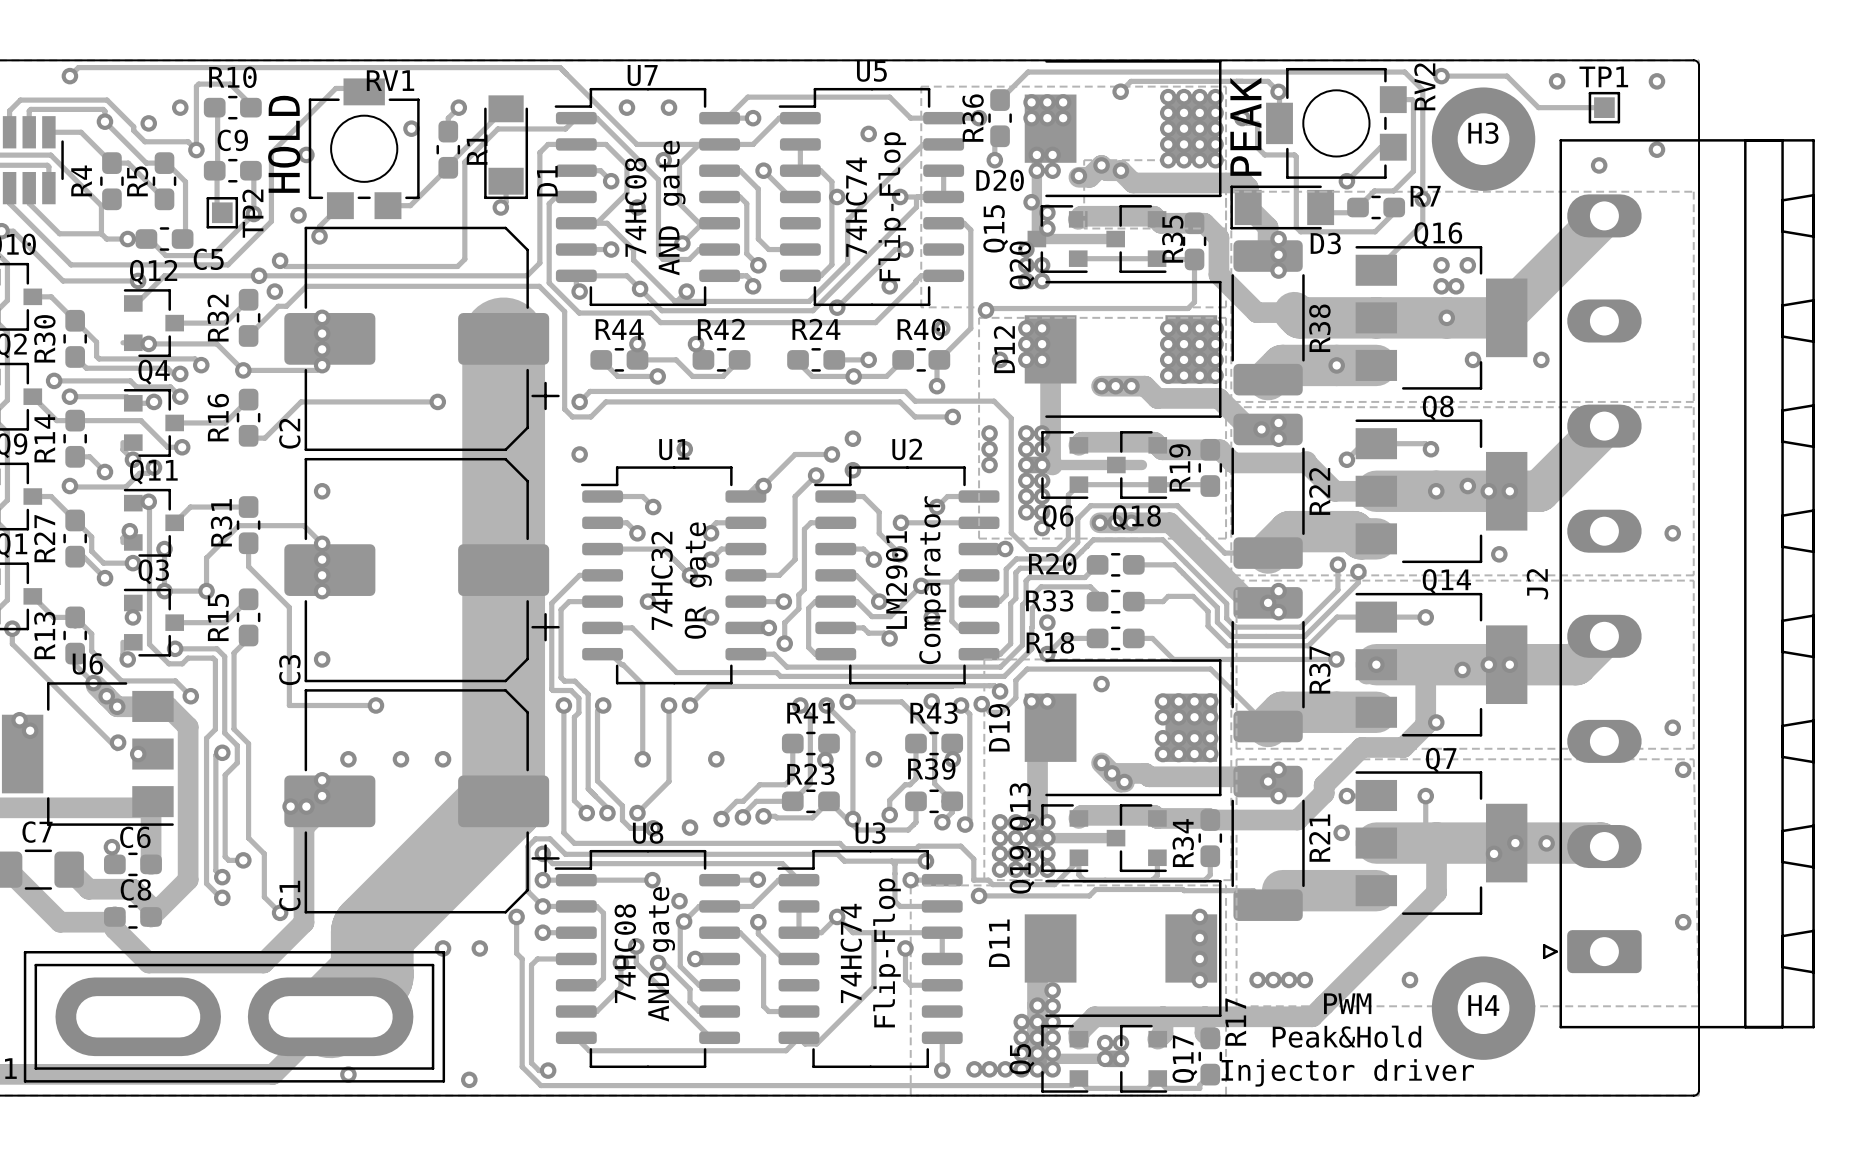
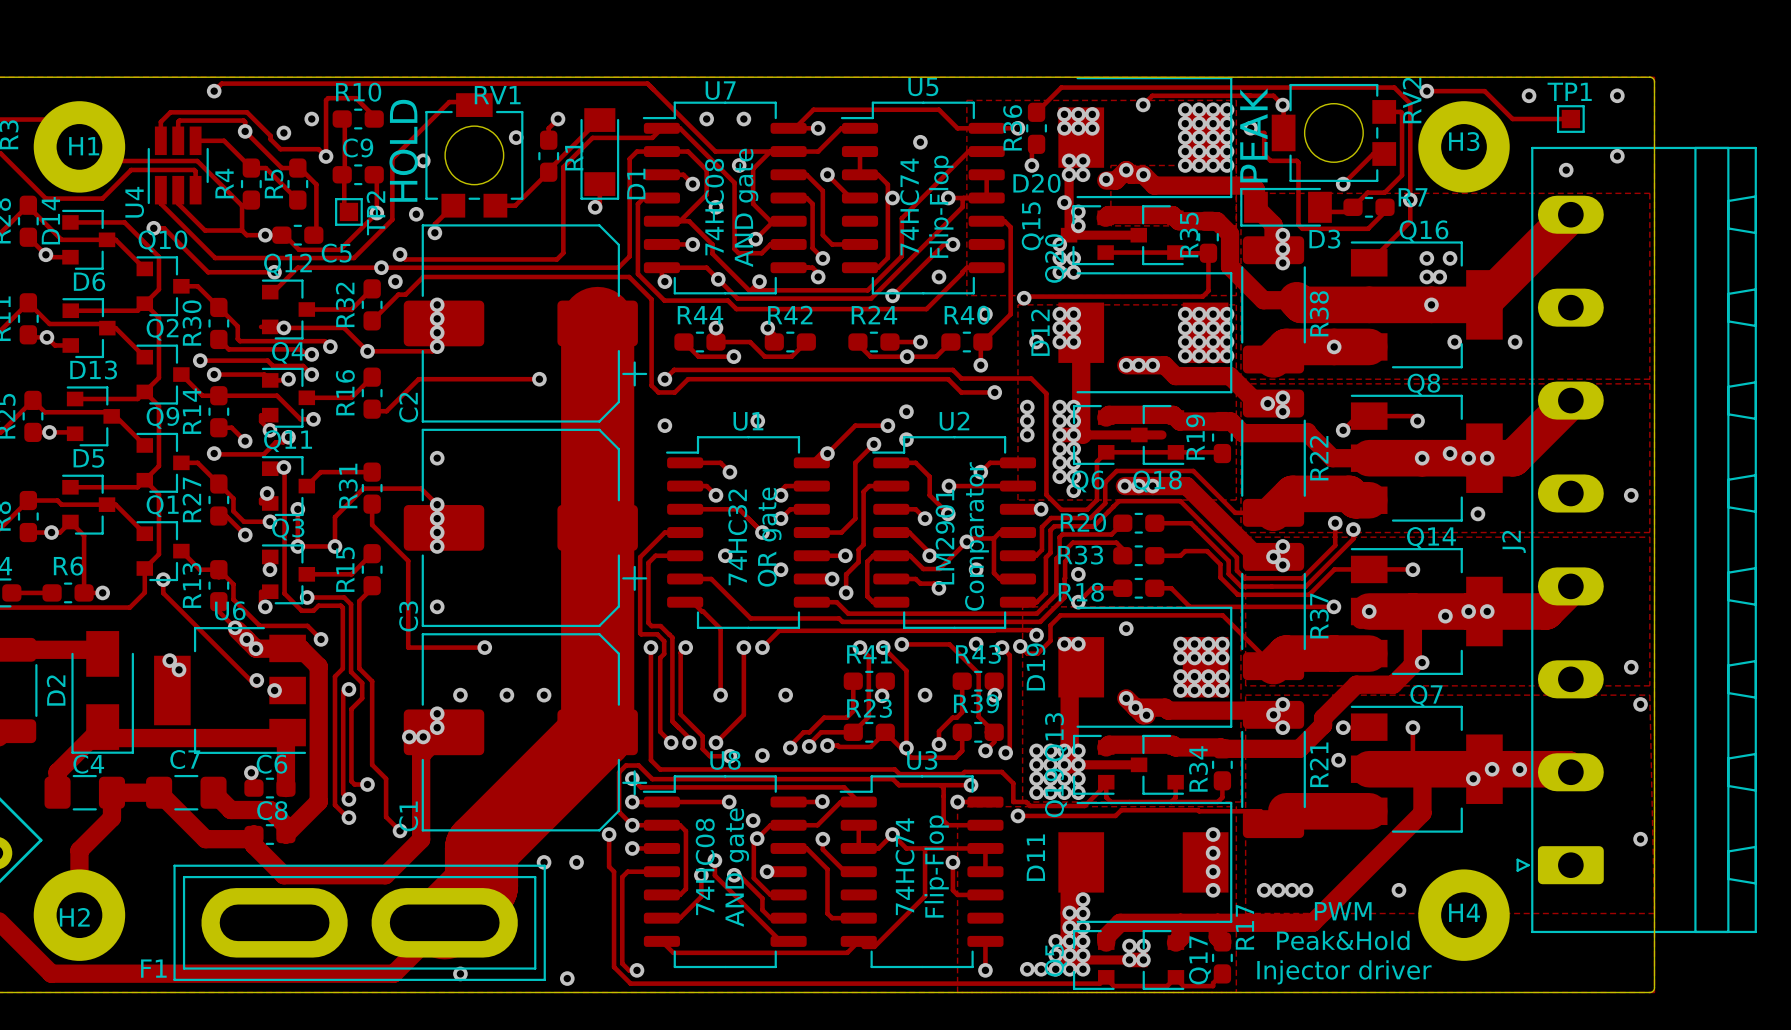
via: (1021, 1022) -> none
via: (974, 1069) -> none

